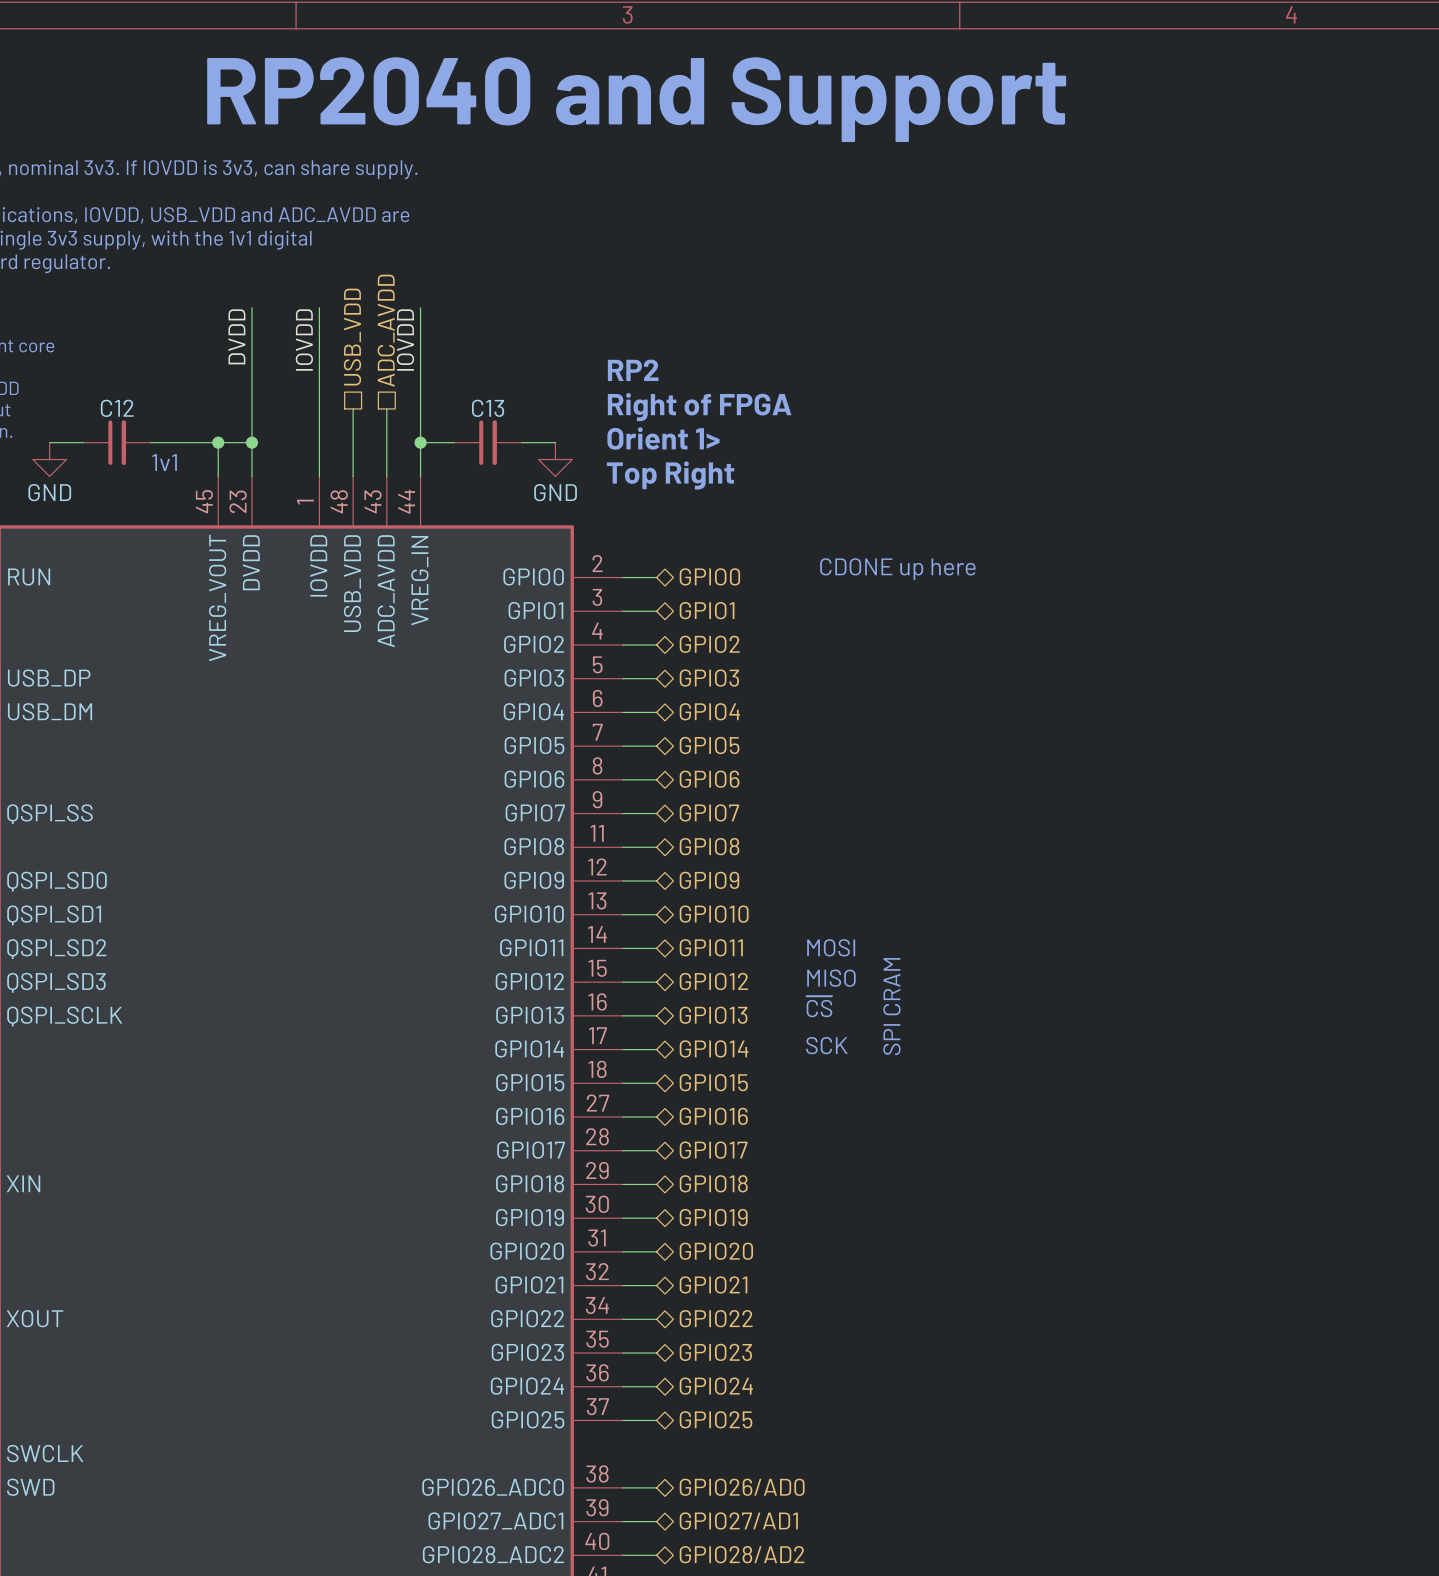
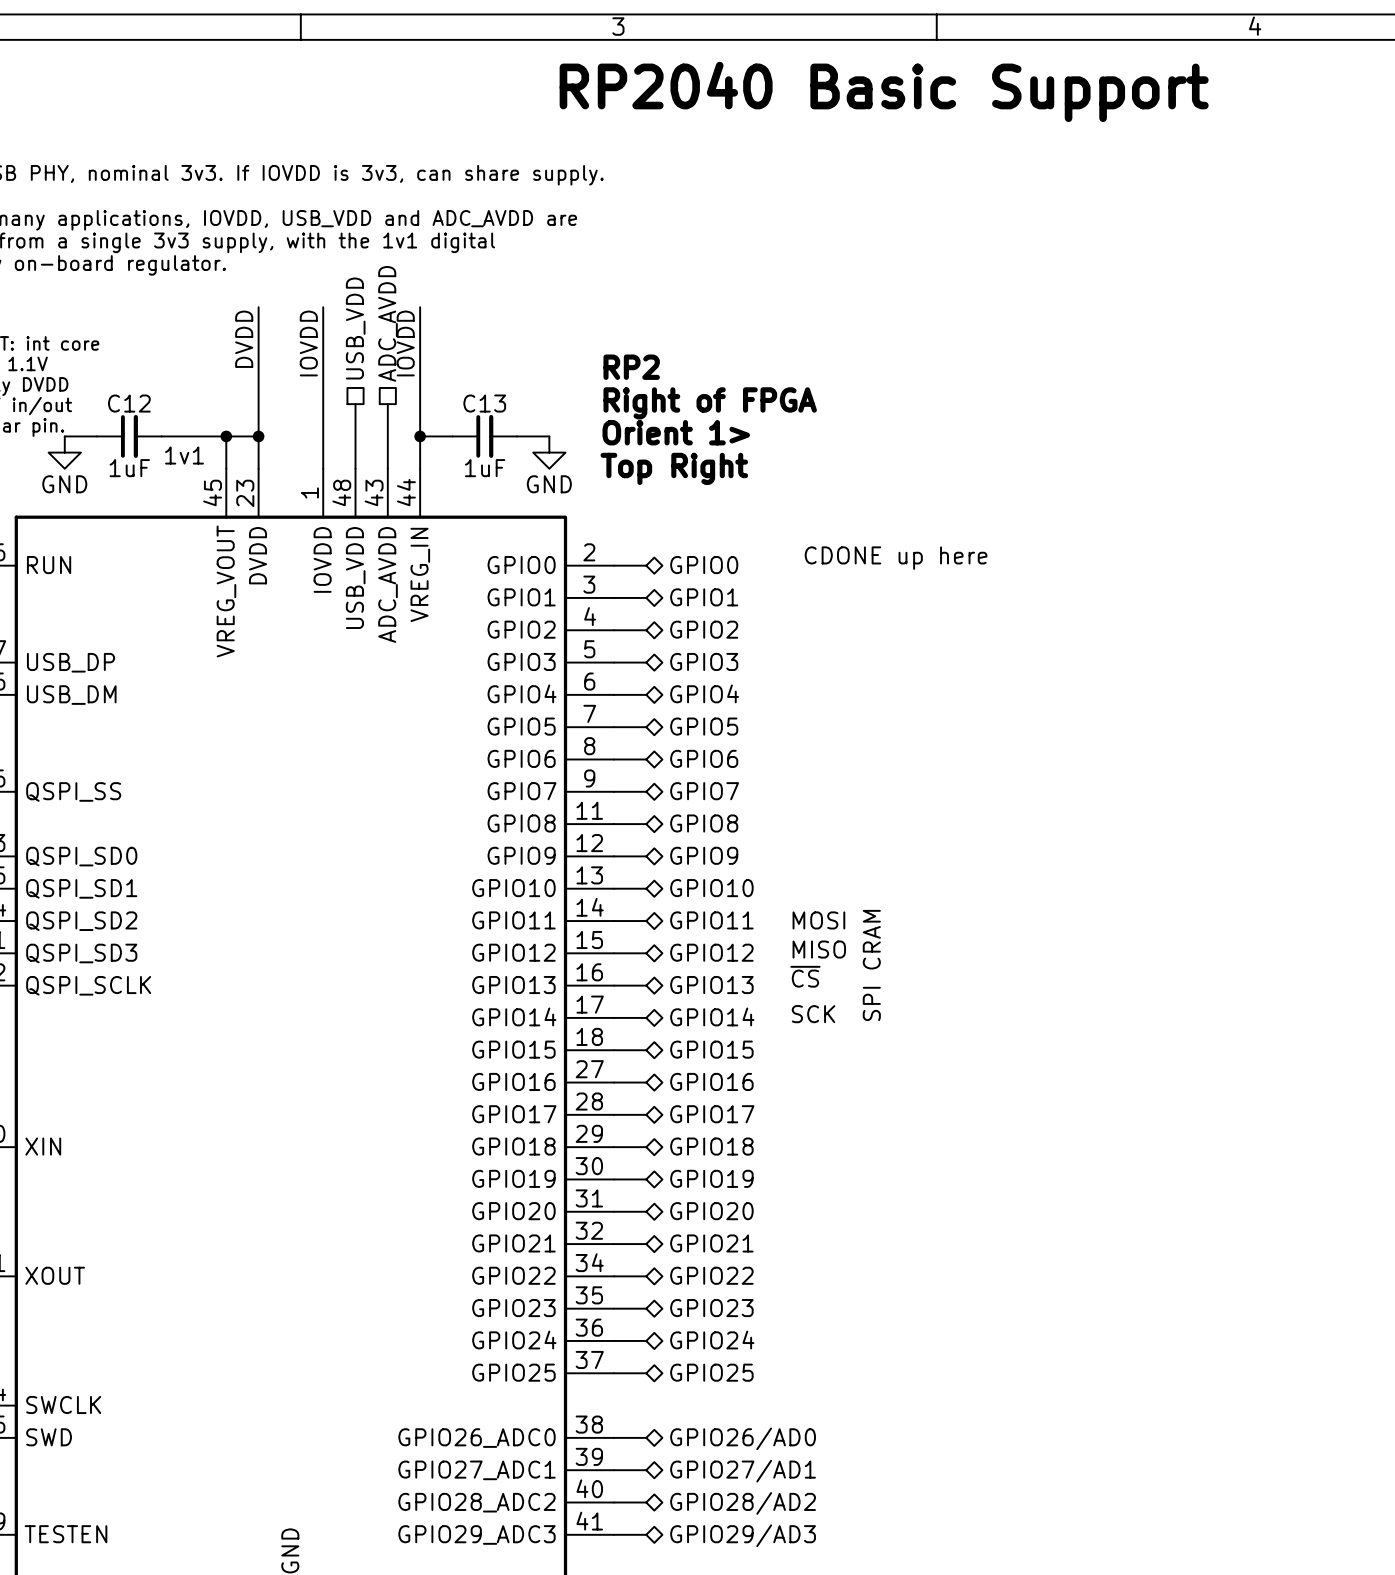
text: none -> RP2040 Basic Support (884, 91)
text: RP2040 and Support (636, 99) -> none
C12 value: none -> 1uF (129, 468)
C13 value: none -> 1uF (485, 468)

